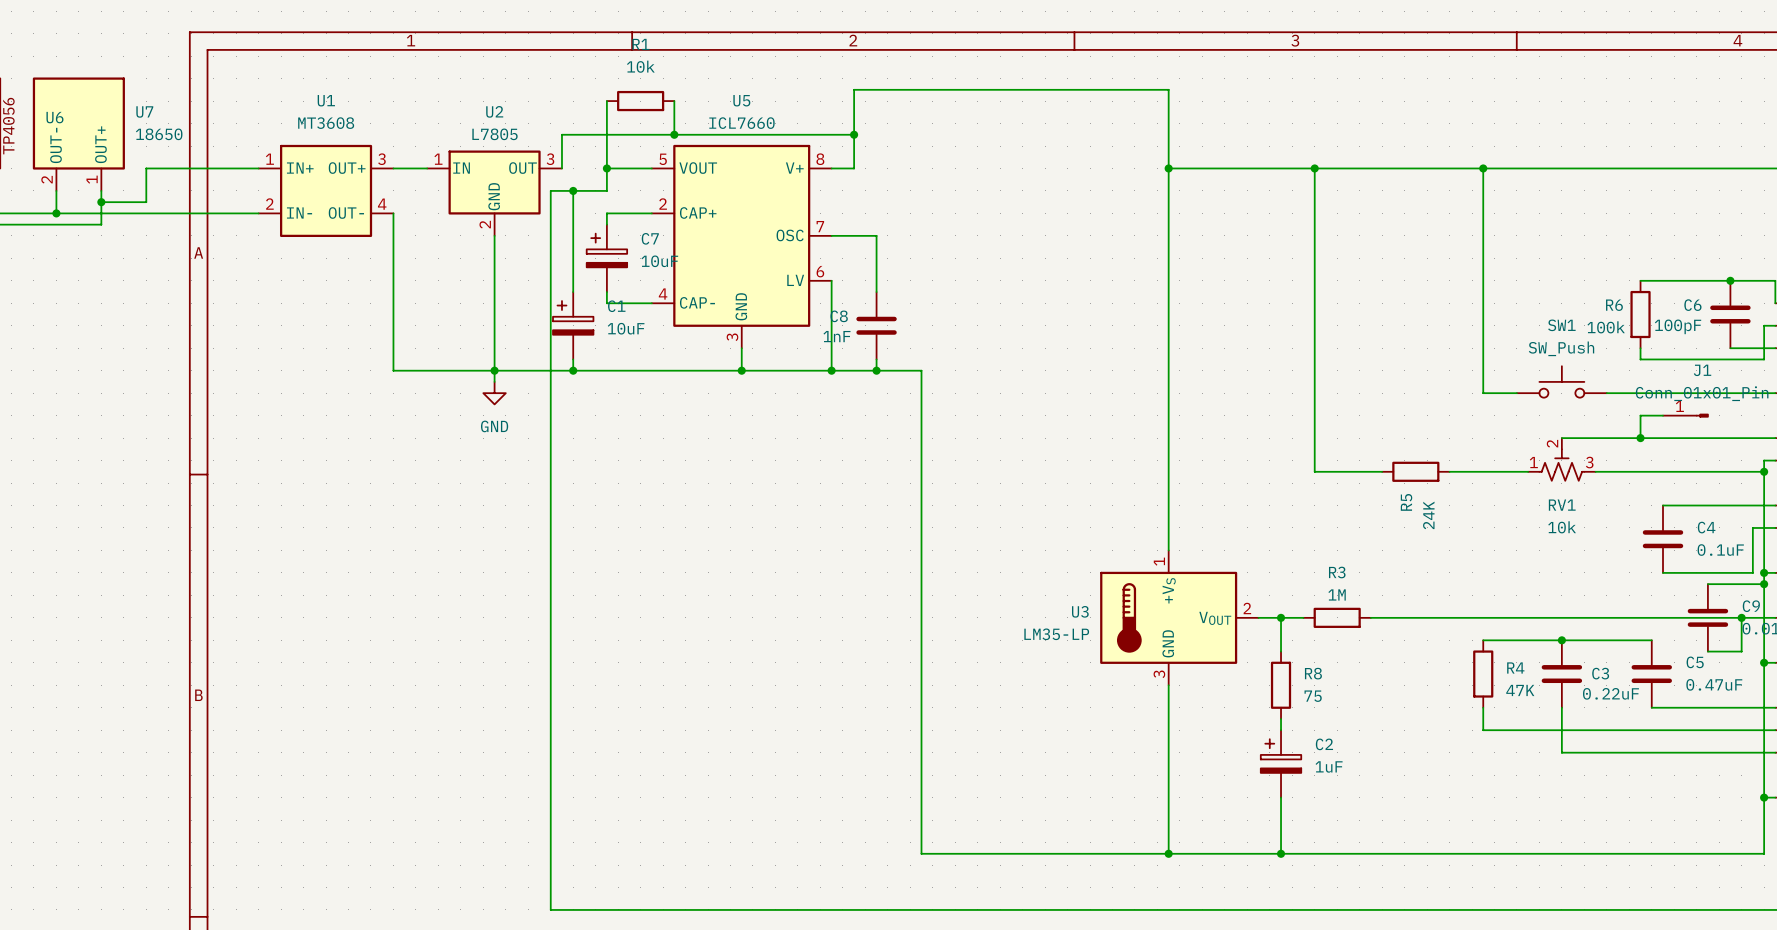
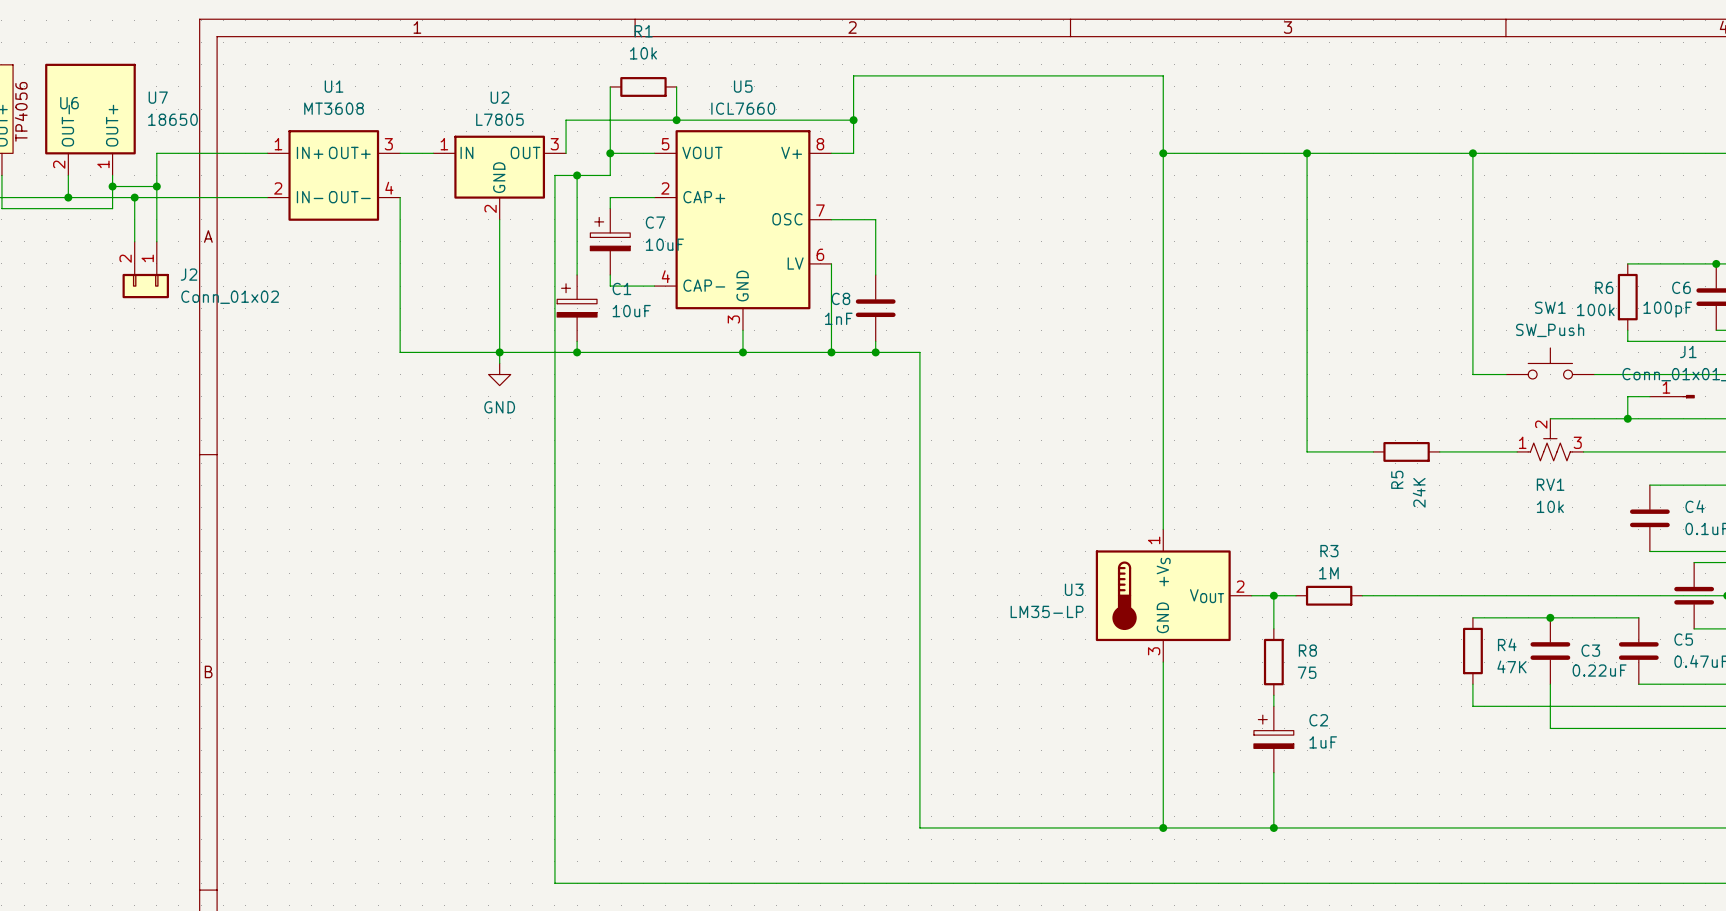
wire: none -> (156, 186) (156, 241)
junction: none -> (156, 186)
wire: none -> (134, 197) (134, 241)
junction: none -> (134, 197)
J2: none -> Conn_01x02 (145, 270)

